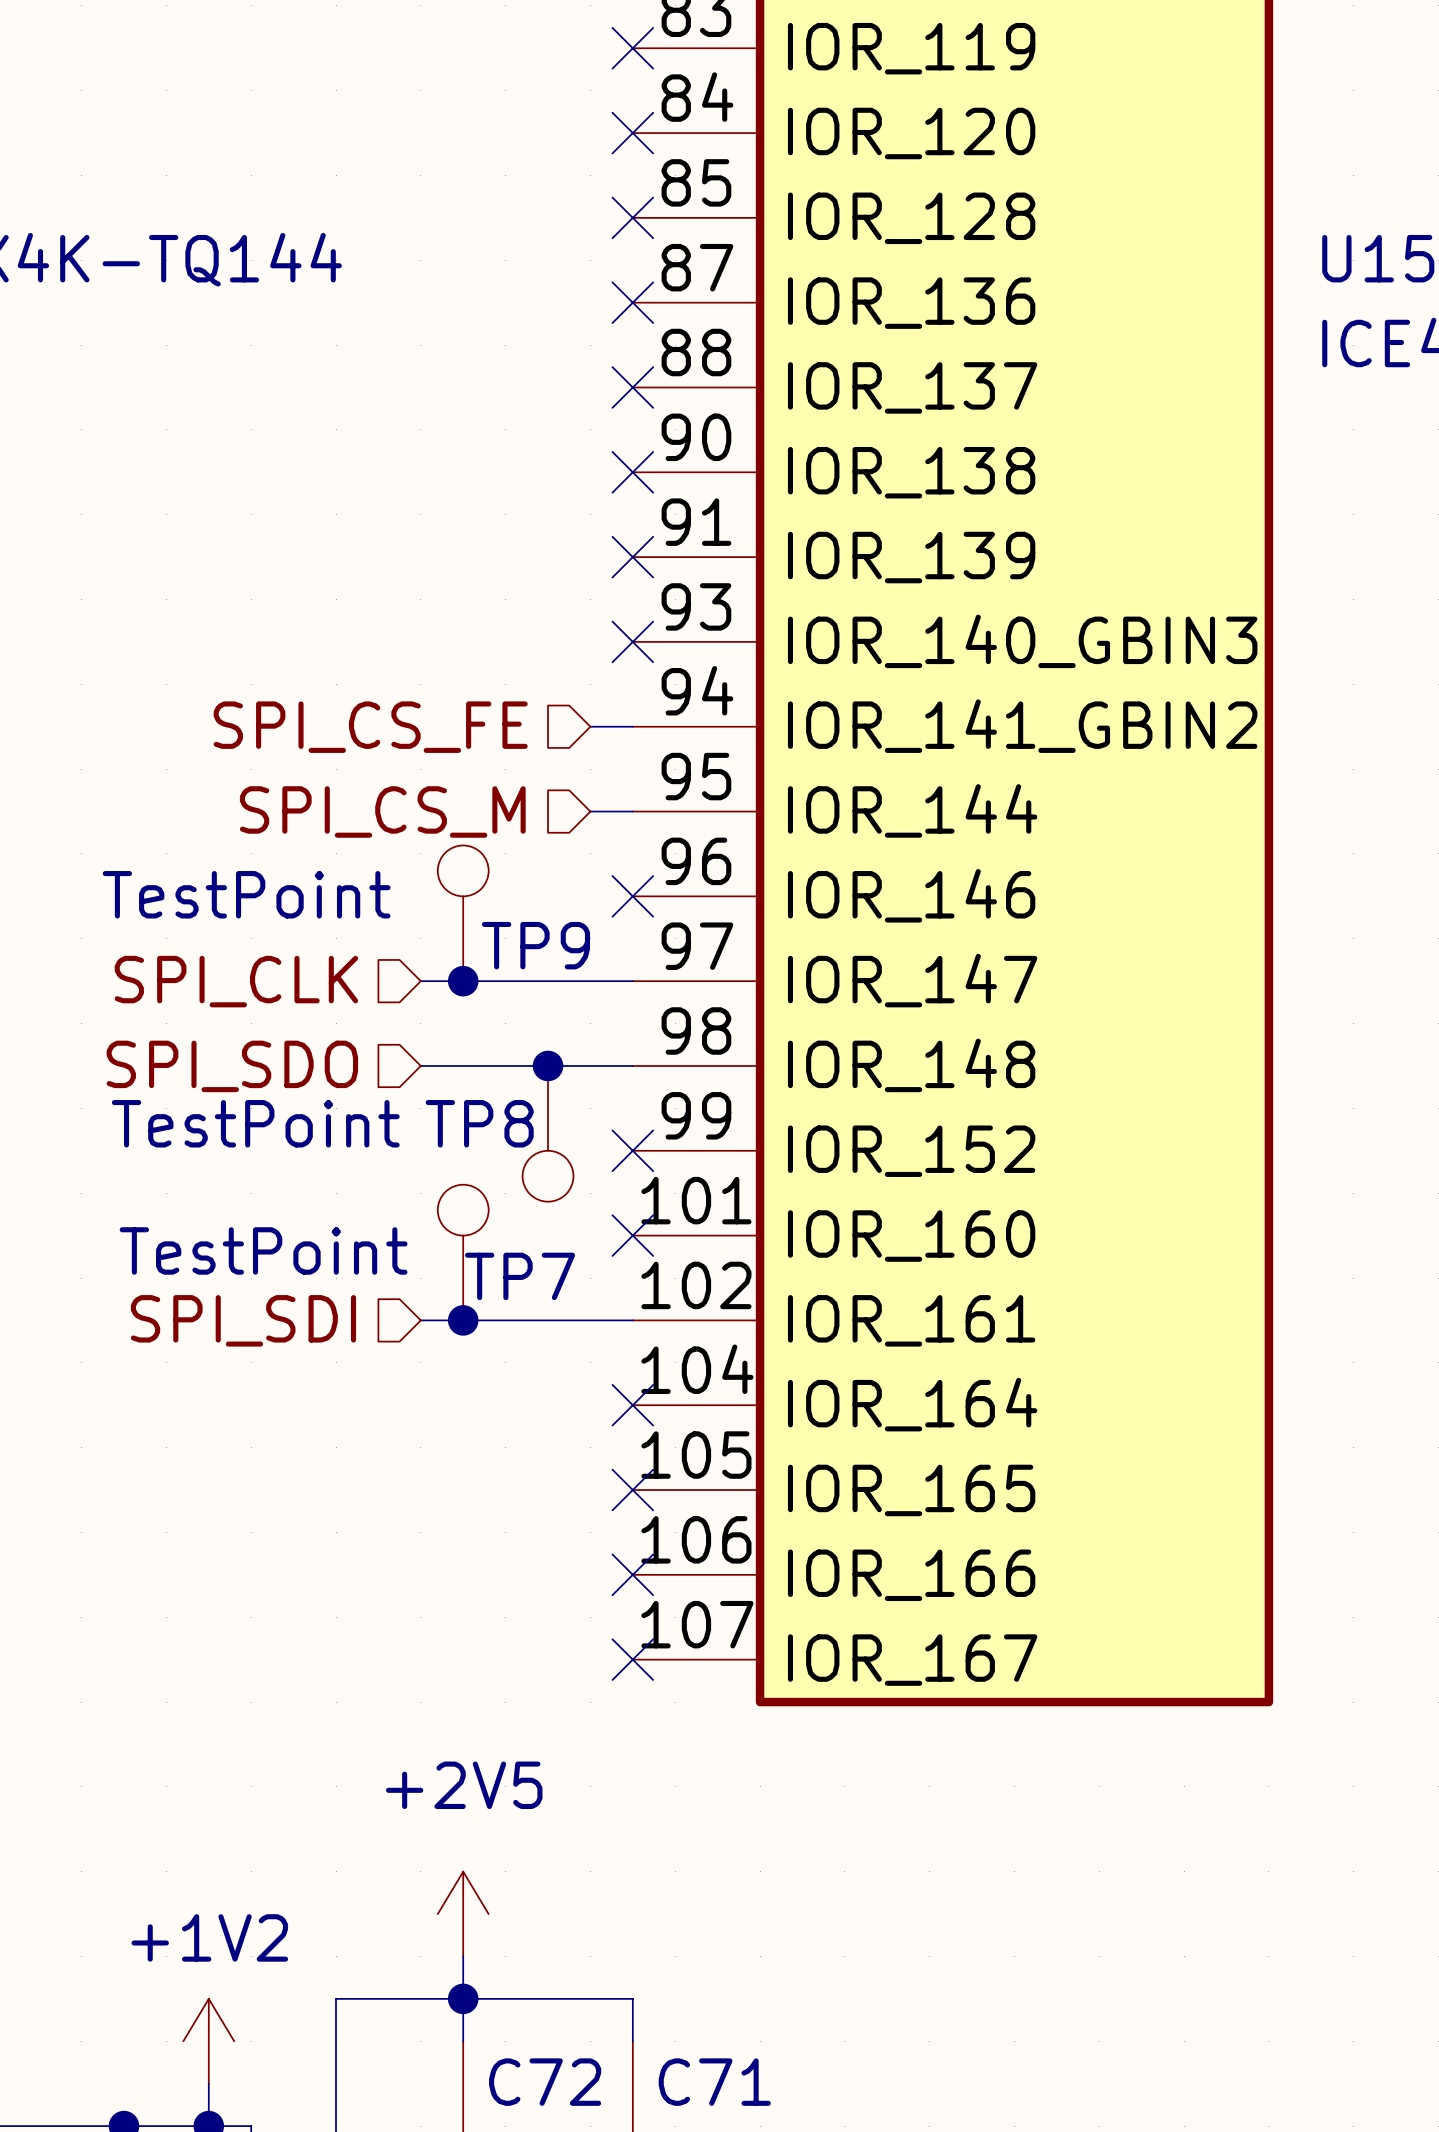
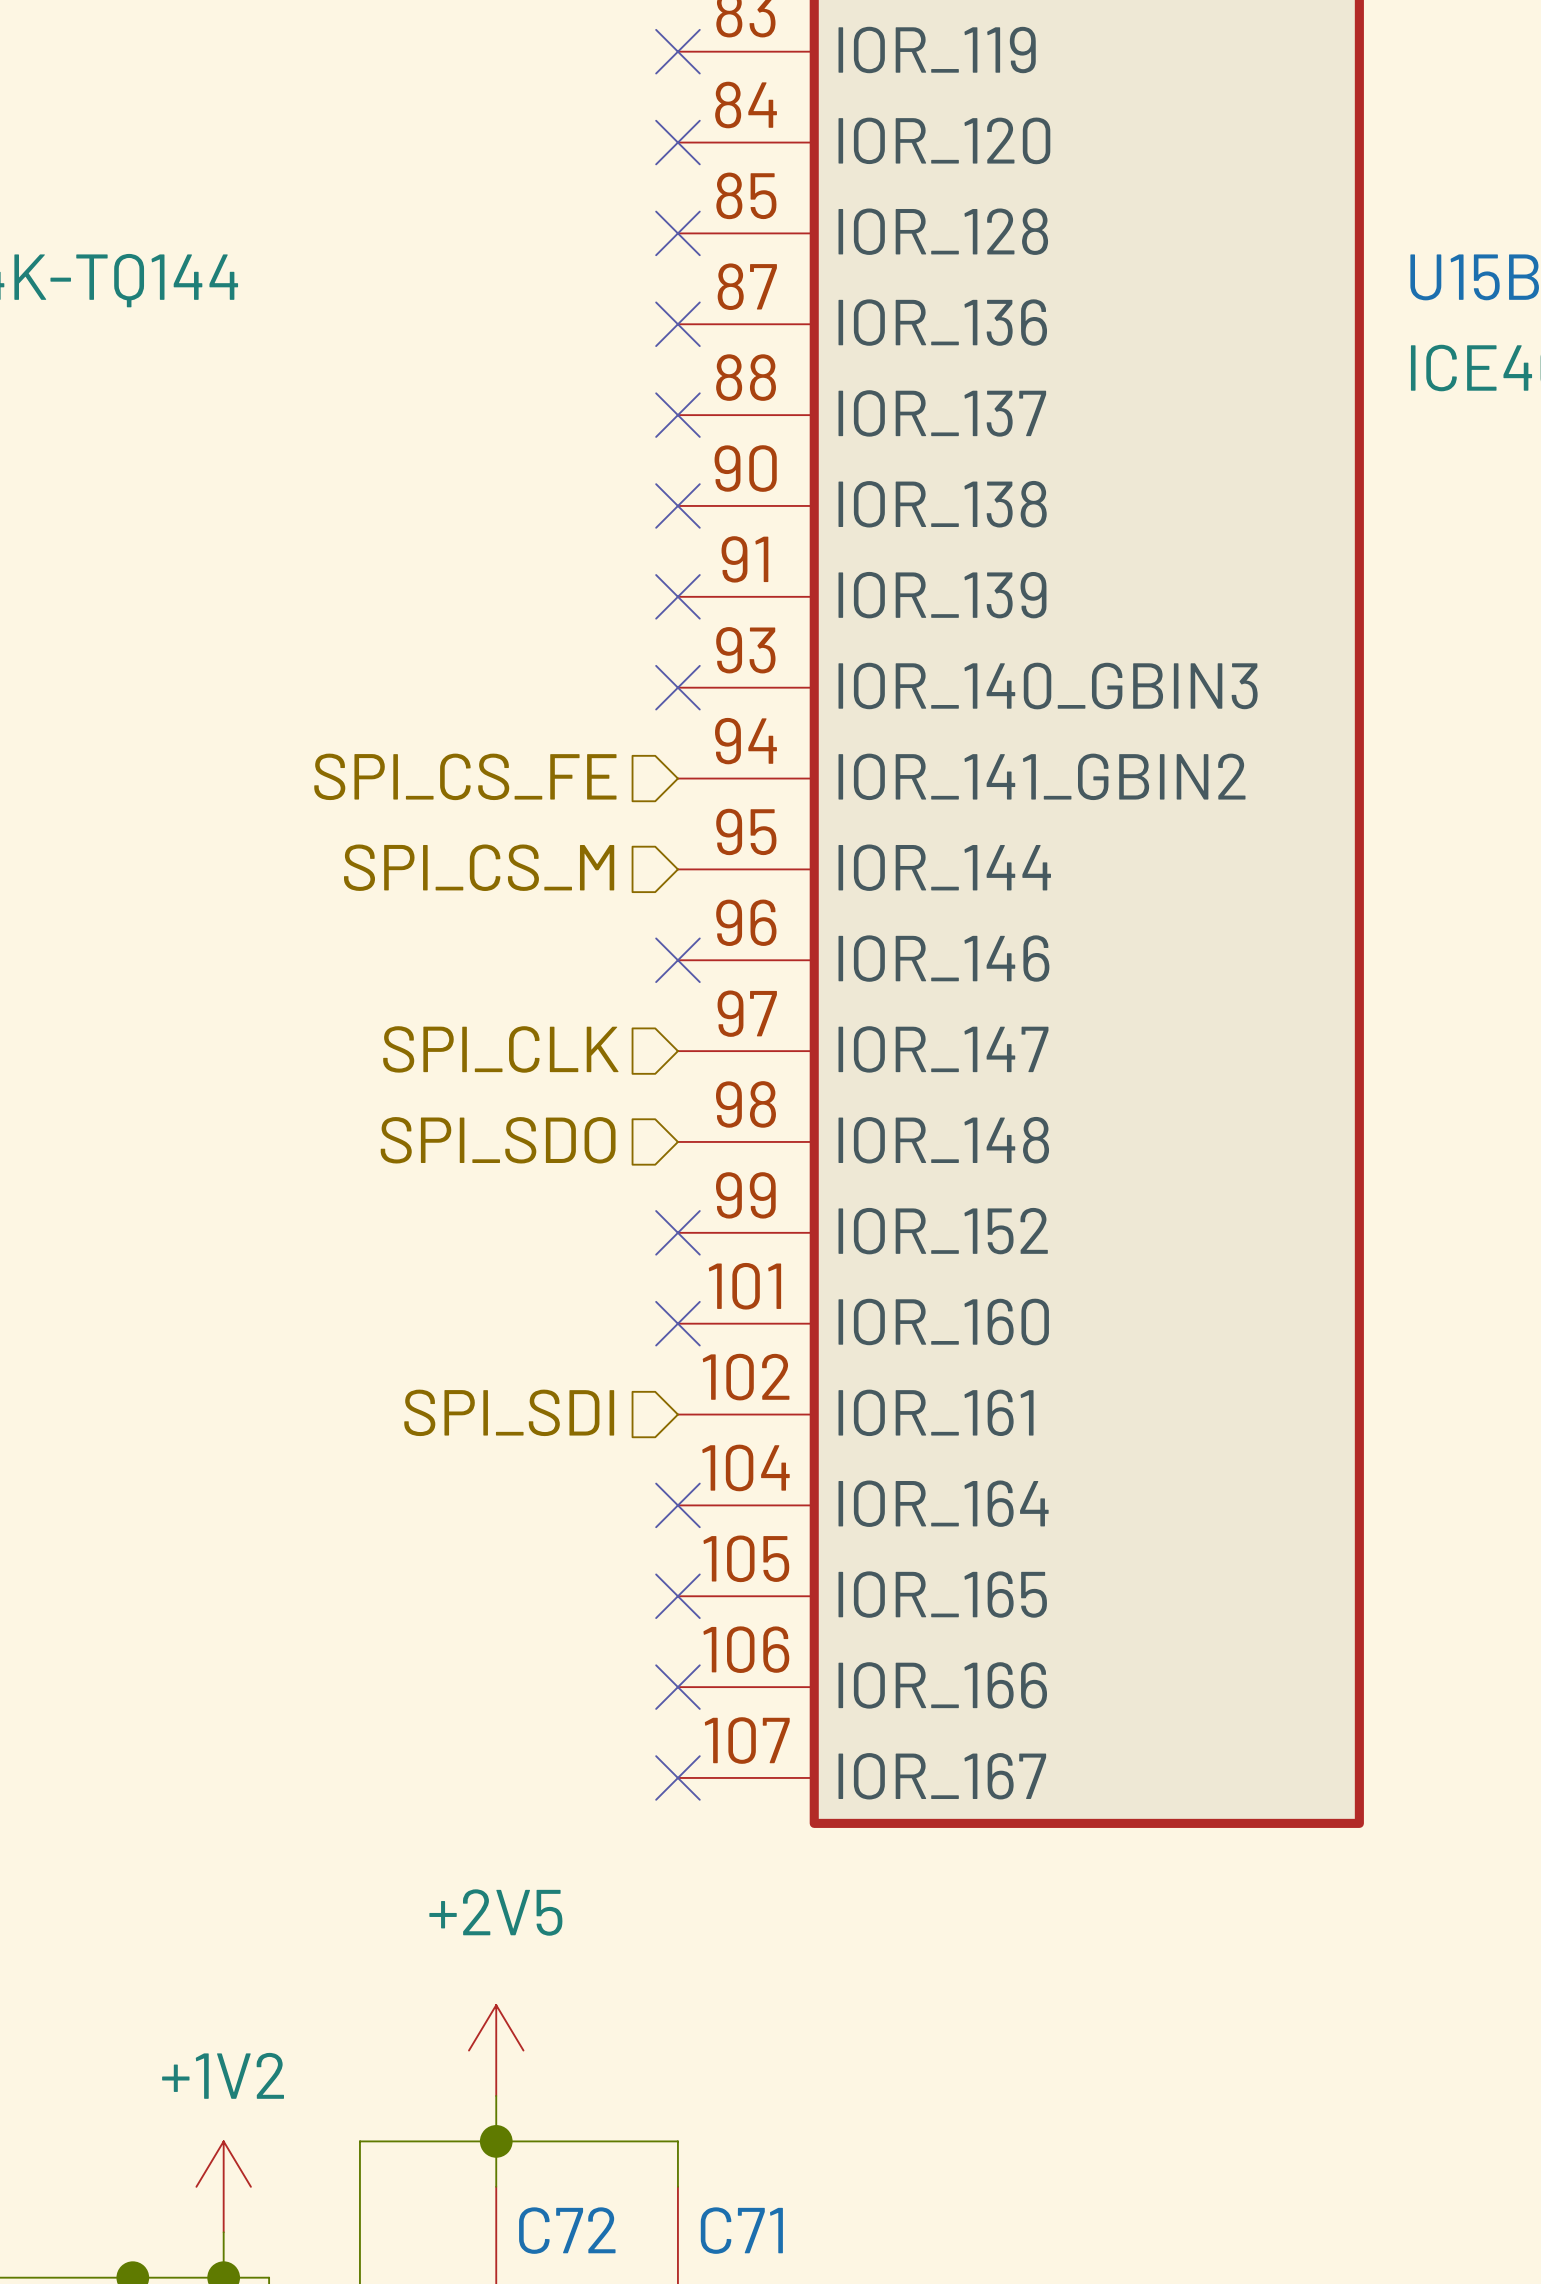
wire: (590, 726) (632, 726) -> none
hierarchical label position: SPI_CS_FE (370, 727) -> SPI_CS_FE (465, 776)
hierarchical label position: SPI_CS_M (382, 811) -> SPI_CS_M (479, 867)
wire: (590, 811) (632, 811) -> none
TP9: TestPoint (463, 913) -> none
hierarchical label position: SPI_CLK (236, 981) -> SPI_CLK (500, 1049)
wire: (420, 981) (632, 981) -> none
junction: (463, 981) -> none
wire: (420, 1065) (632, 1065) -> none
junction: (548, 1065) -> none
hierarchical label position: SPI_SDO (232, 1066) -> SPI_SDO (498, 1140)
TP8: TestPoint (548, 1133) -> none
TP7: TestPoint (463, 1252) -> none
hierarchical label position: SPI_SDI (243, 1320) -> SPI_SDI (509, 1412)
wire: (420, 1320) (632, 1320) -> none
junction: (463, 1320) -> none

